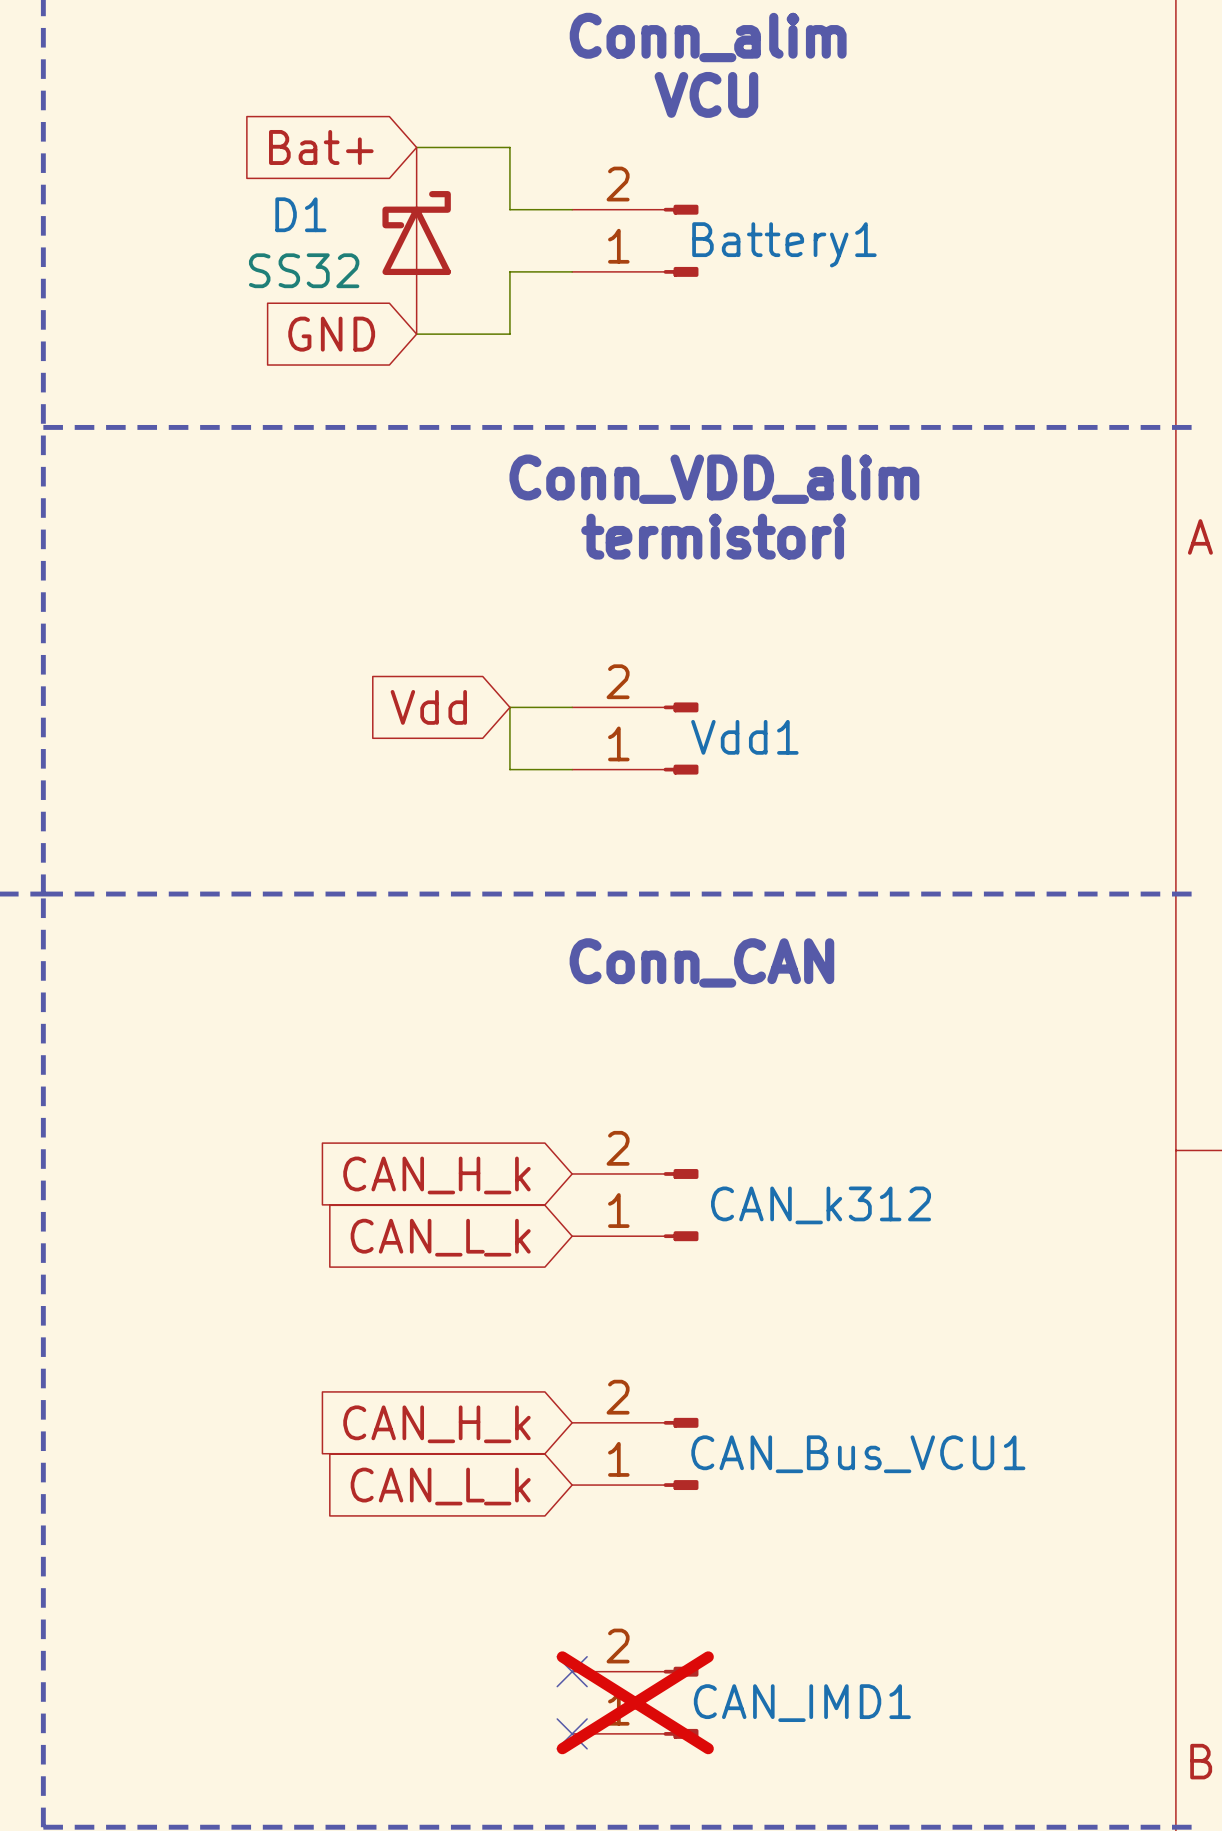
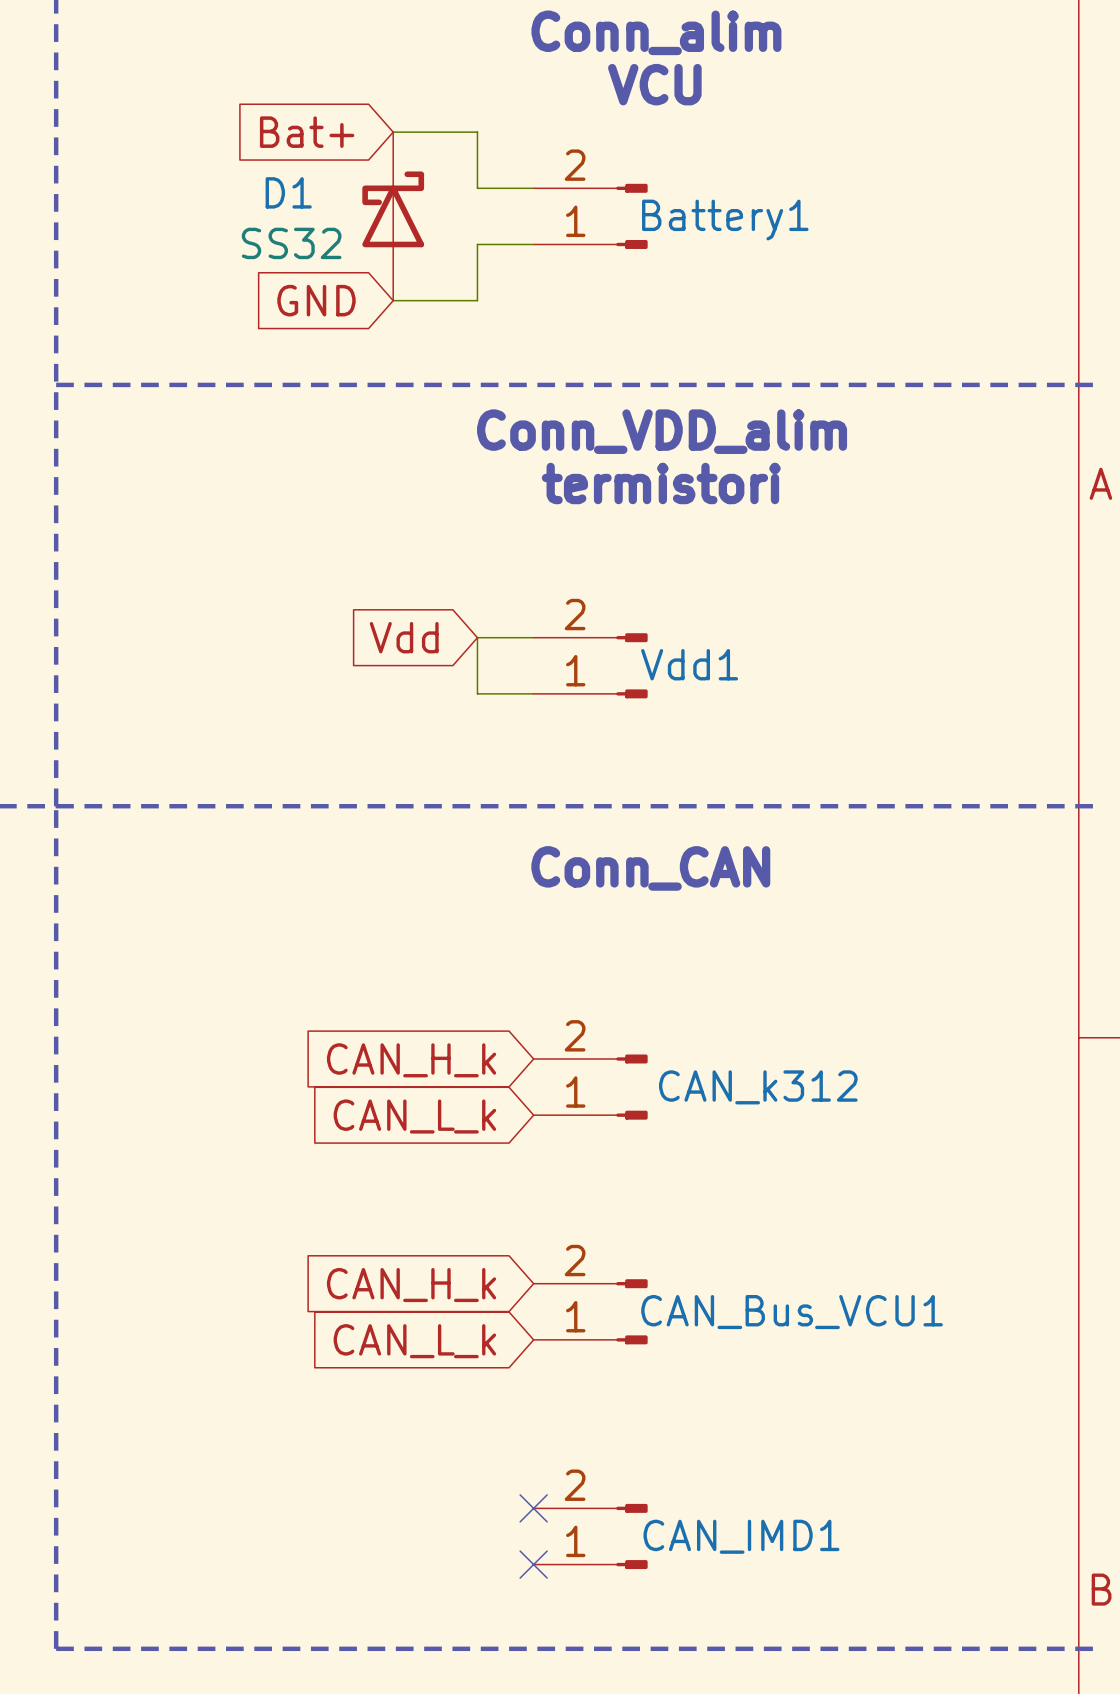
CAN_IMD1 do-not-place cross: (635, 1702) -> none

